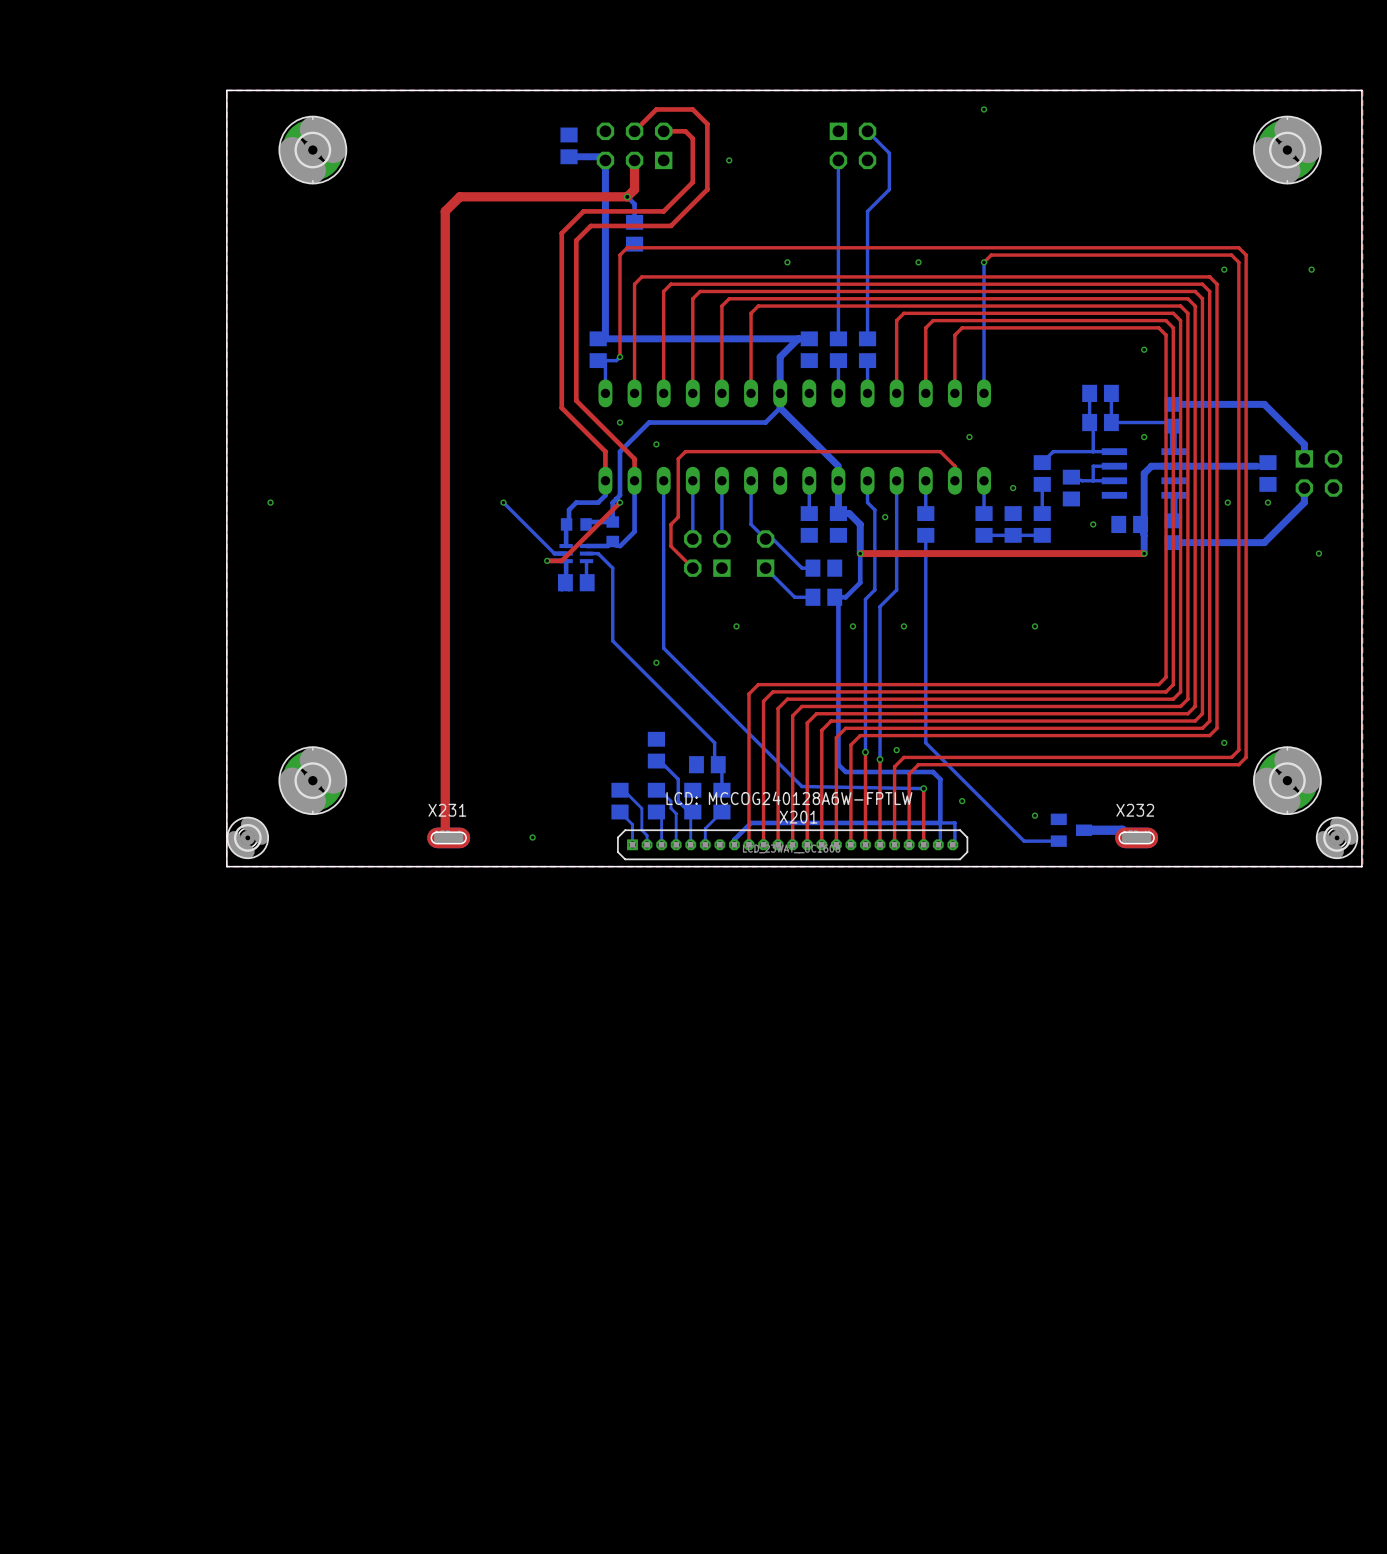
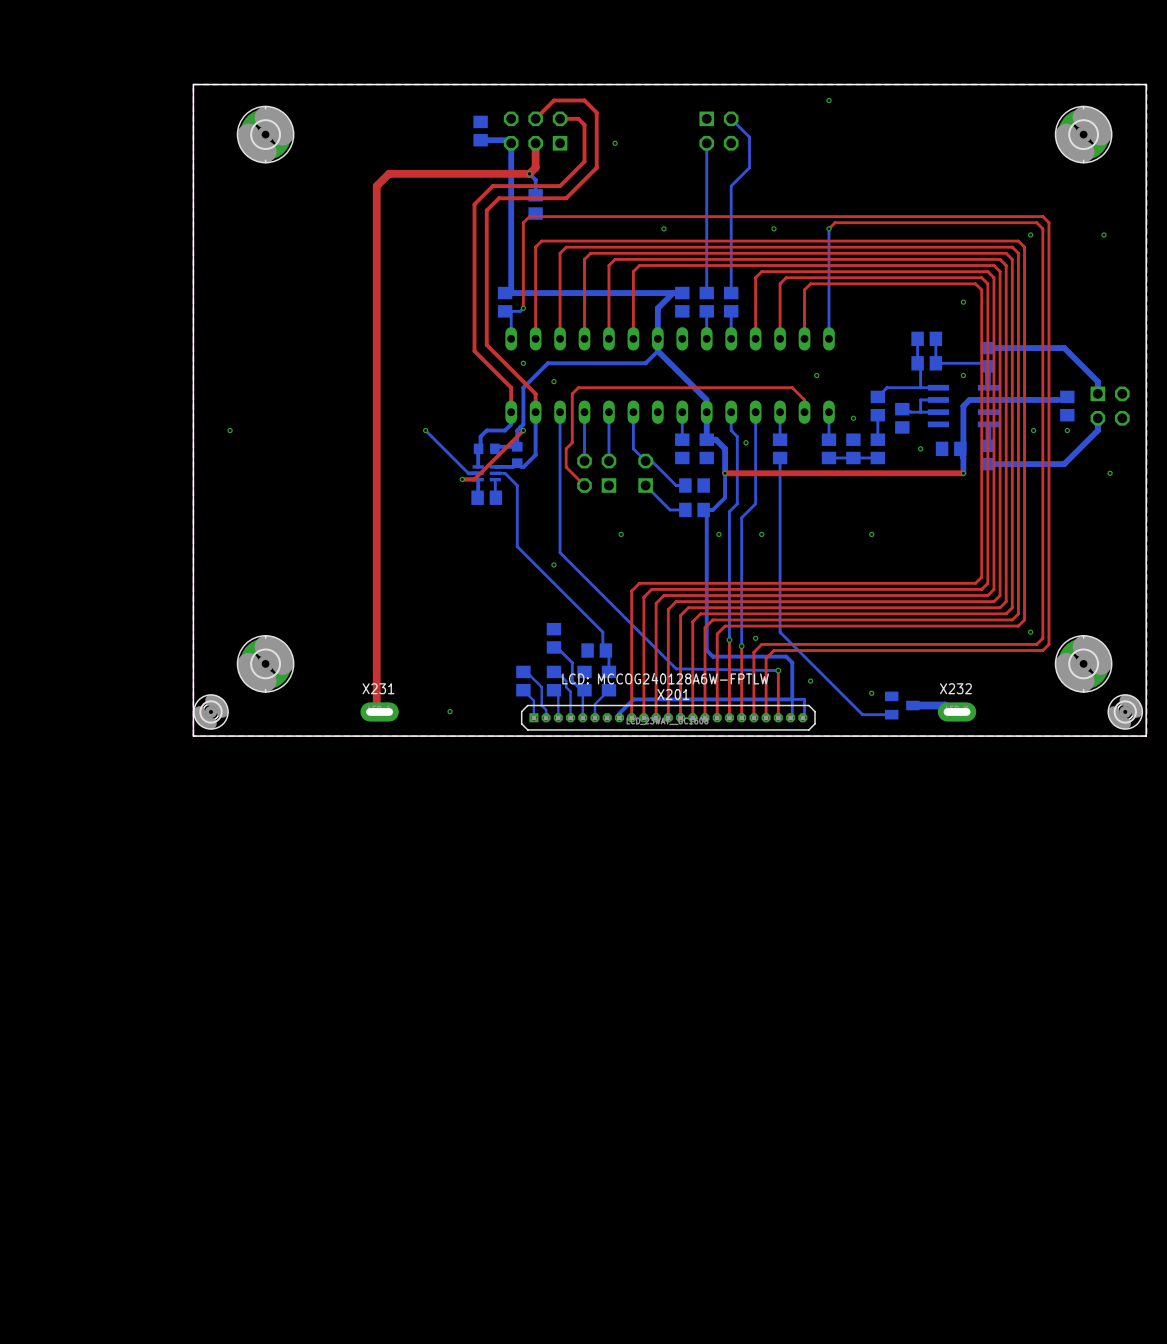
X231 footprint: [427, 827, 471, 849] -> [360, 702, 399, 722]
X232 footprint: [1115, 827, 1159, 849] -> [937, 702, 977, 722]

